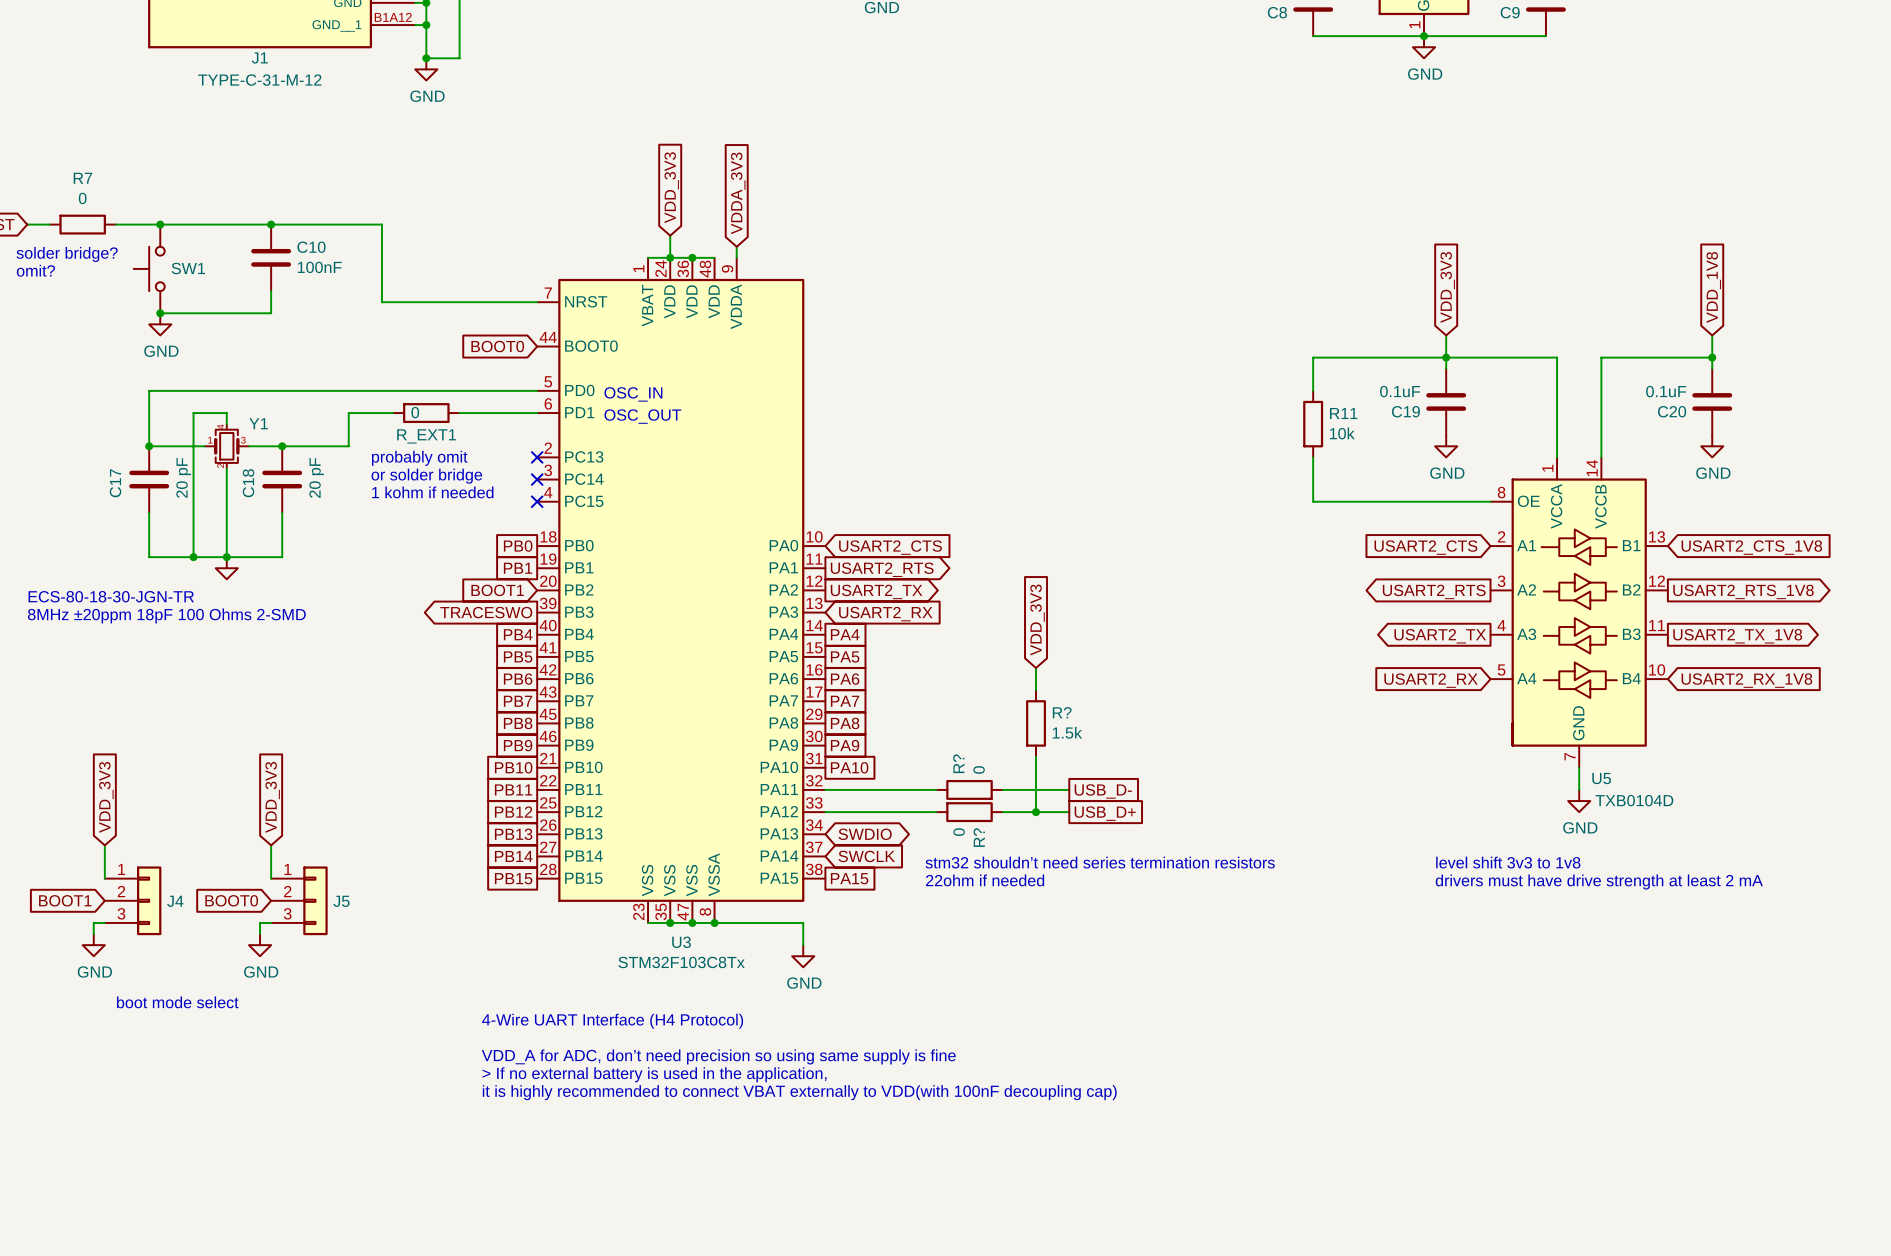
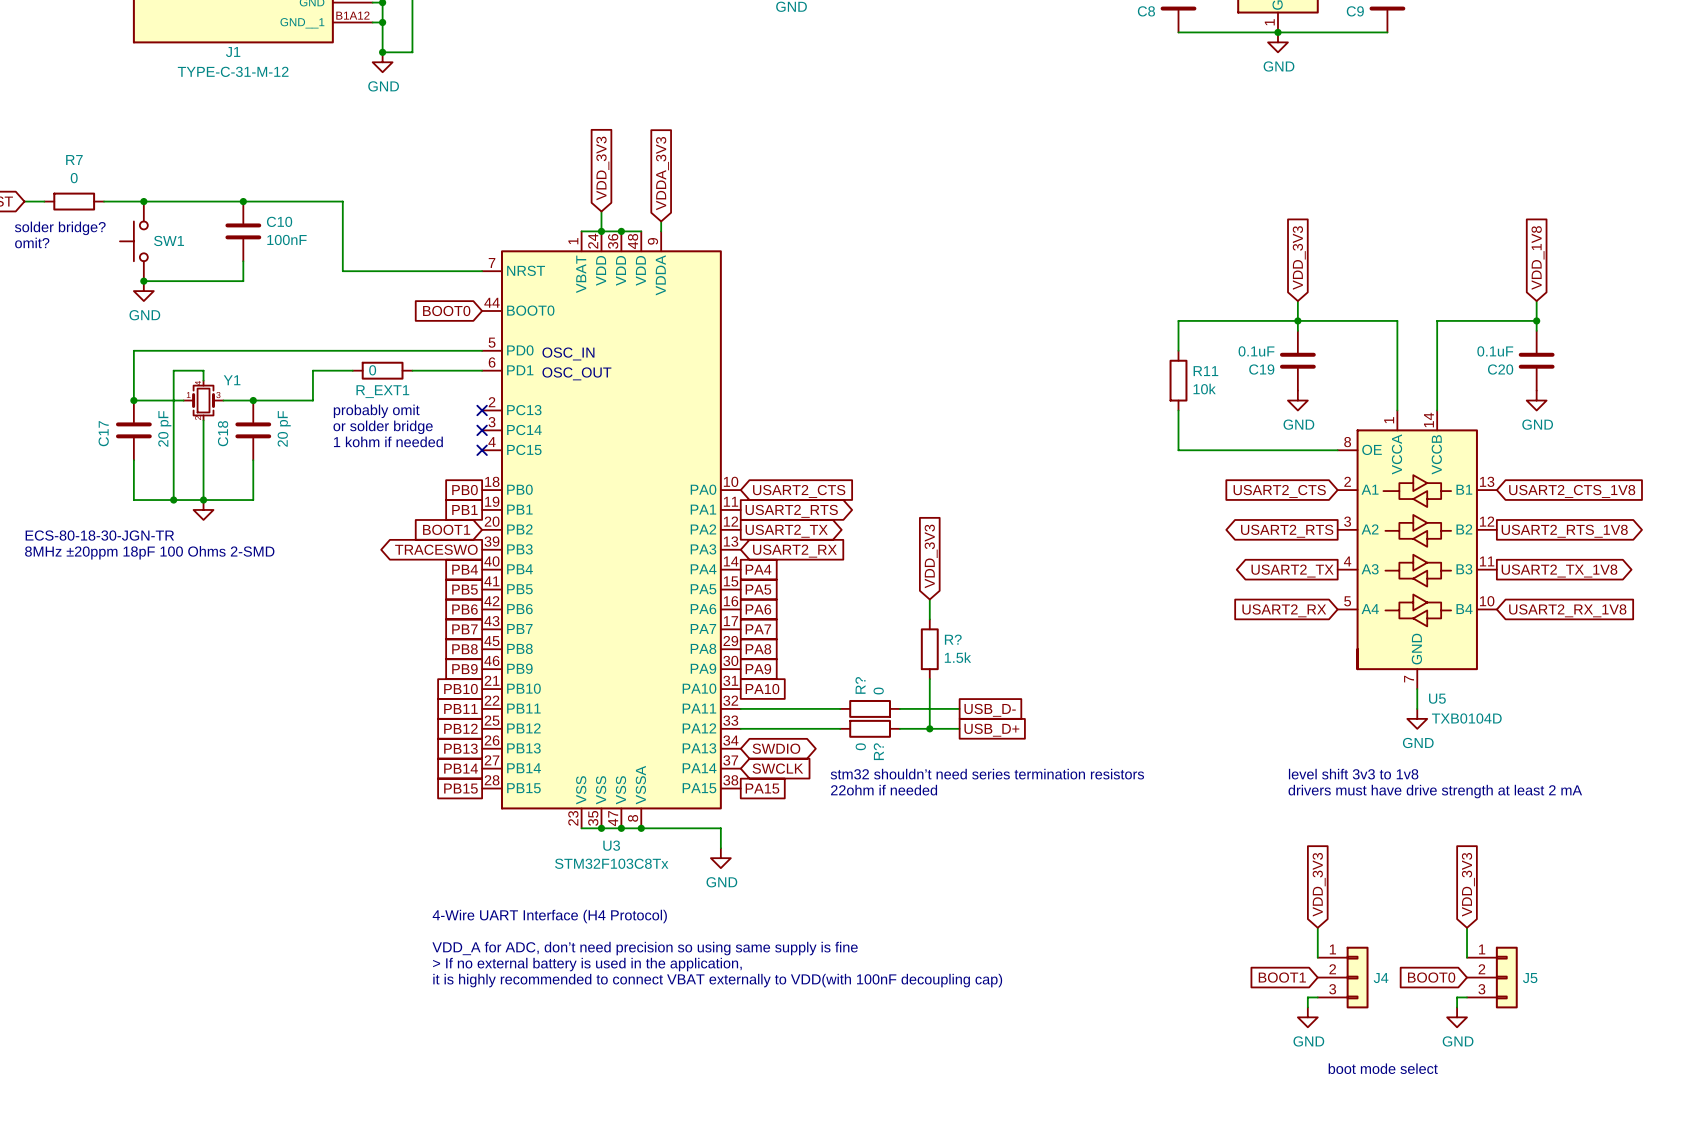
global label: VDD_3V3 (106, 797) -> none
global label: VDD_3V3 (272, 797) -> none
wire: (104, 845) (104, 878) -> none
wire: (271, 845) (271, 878) -> none
global label: BOOT1 (65, 900) -> none
J4 position: (133, 900) -> (1343, 977)
global label: BOOT0 (231, 900) -> none
J5 position: (299, 900) -> (1492, 977)
wire: (104, 922) (93, 922) (93, 934) -> none
wire: (271, 922) (260, 922) (260, 934) -> none
power symbol: GND (93, 945) -> none
power symbol: GND (260, 945) -> none
global label: none -> VDD_3V3 (1319, 884)
global label: none -> VDD_3V3 (1468, 884)
text: boot mode select (177, 1002) -> none
wire: none -> (1317, 927) (1317, 957)
wire: none -> (1467, 927) (1467, 957)
global label: none -> BOOT1 (1282, 977)
global label: none -> BOOT0 (1431, 977)
wire: none -> (1317, 997) (1307, 997) (1307, 1007)
wire: none -> (1467, 997) (1457, 997) (1457, 1007)
power symbol: none -> GND (1307, 1017)
power symbol: none -> GND (1457, 1017)
text: none -> boot mode select (1383, 1068)

